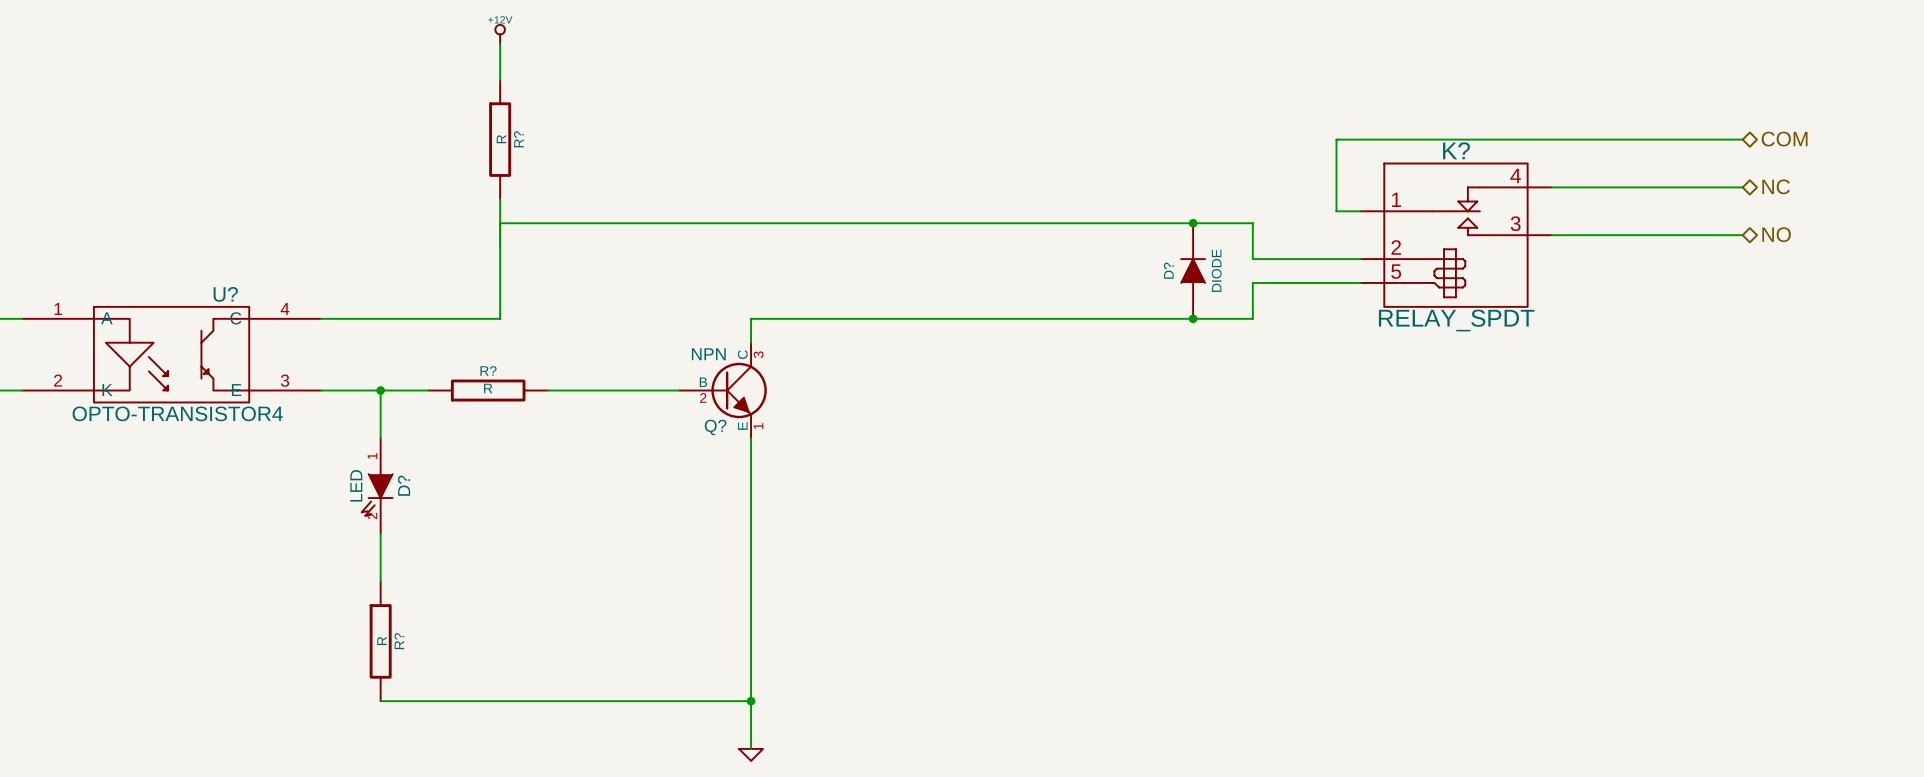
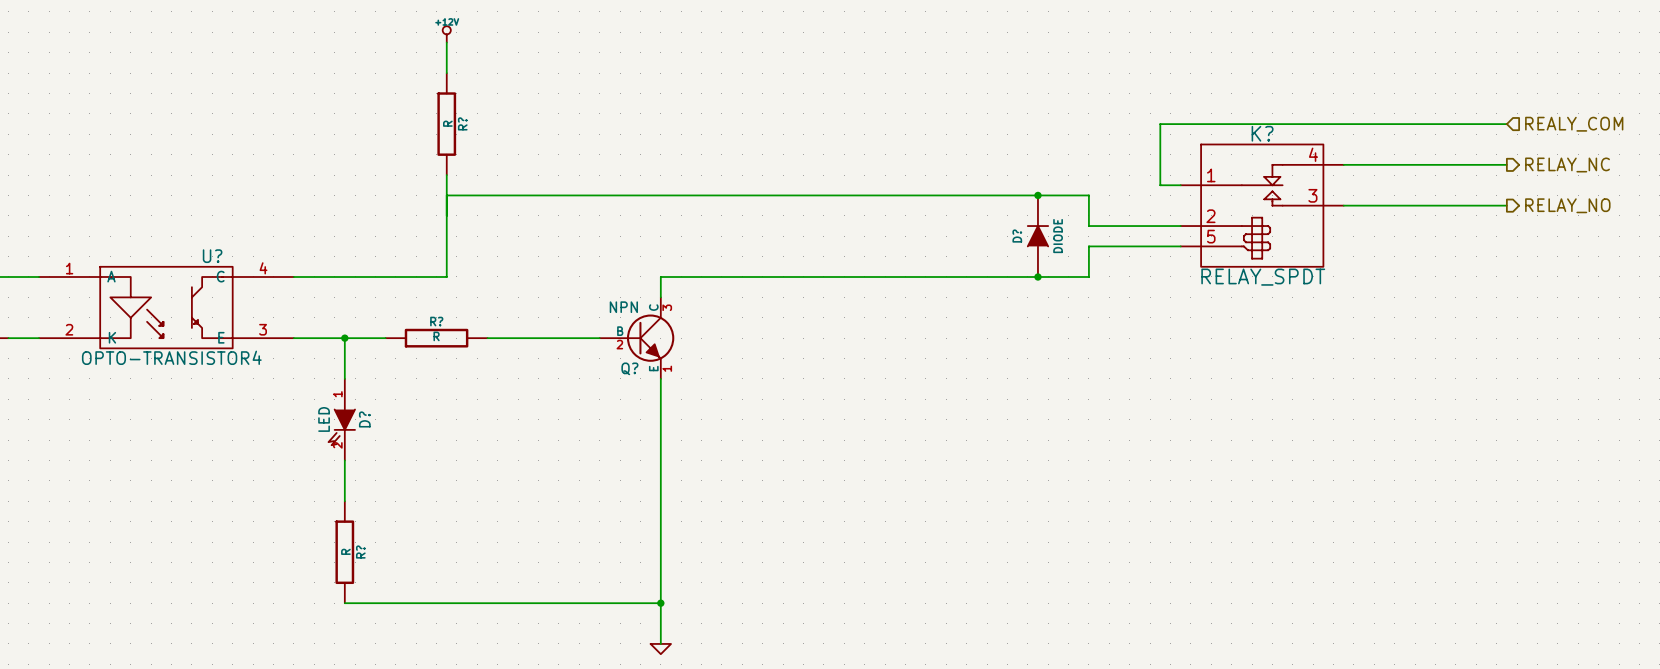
hierarchical label shape: bidirectional (1784, 139) -> input (1574, 124)
hierarchical label: COM (1784, 139) -> REALY_COM (1574, 124)
hierarchical label shape: bidirectional (1776, 186) -> output (1567, 164)
hierarchical label: NC (1776, 186) -> RELAY_NC (1567, 164)
hierarchical label shape: bidirectional (1776, 234) -> output (1567, 205)
hierarchical label: NO (1776, 234) -> RELAY_NO (1567, 205)

